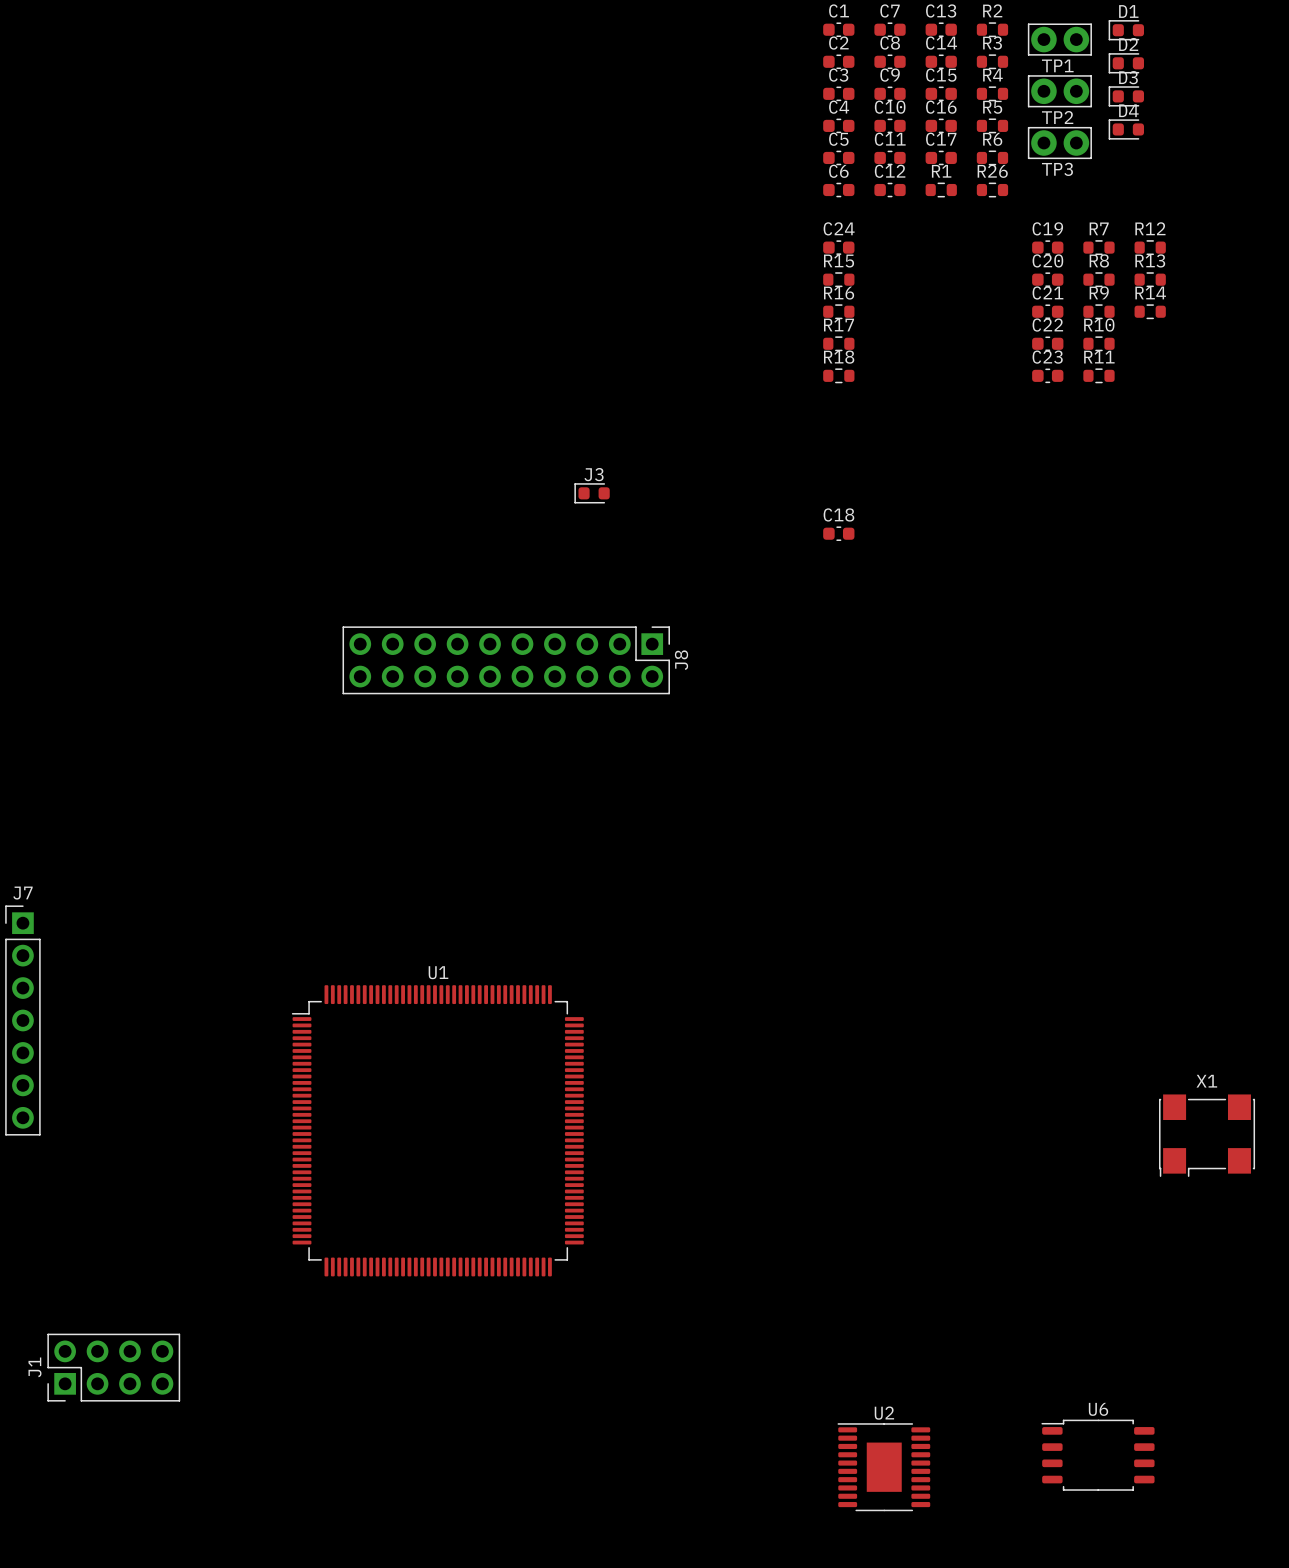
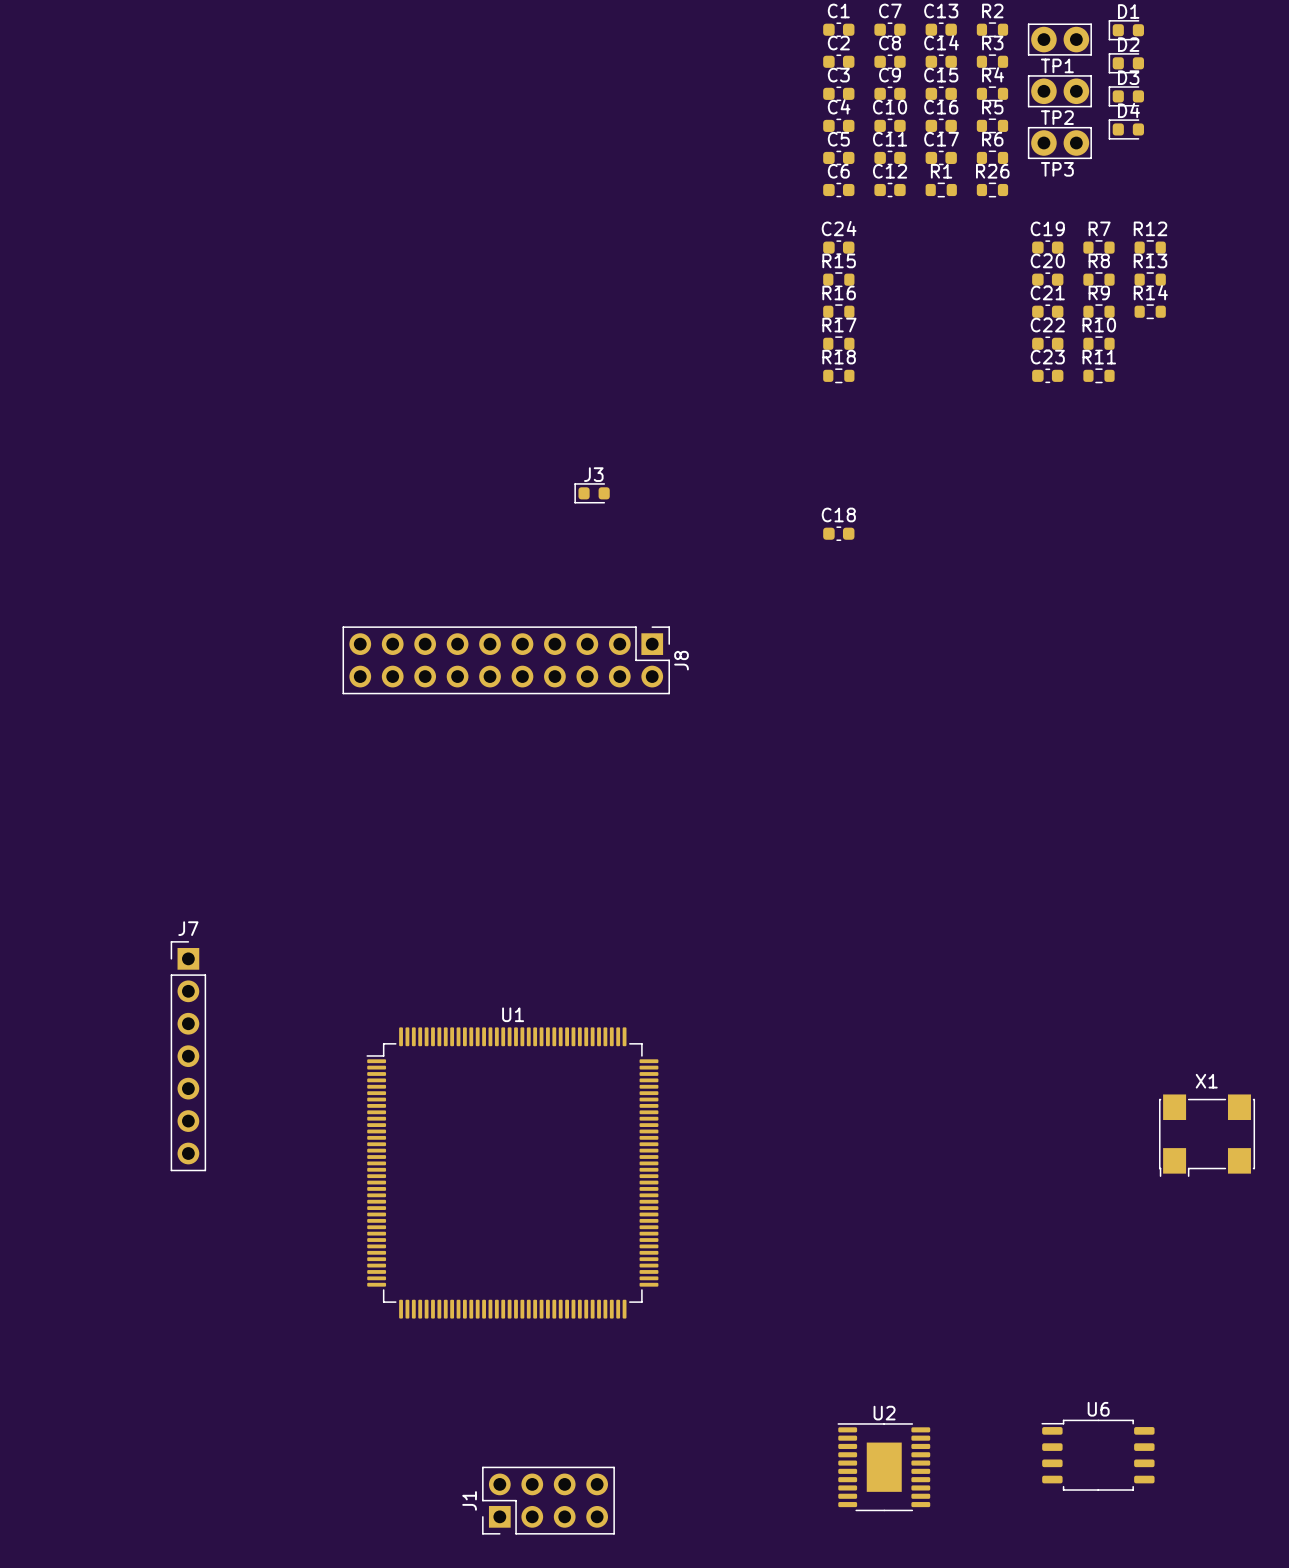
J7 position: (22, 1020) -> (188, 1056)
U1 position: (437, 1130) -> (512, 1172)
J1 position: (113, 1367) -> (548, 1500)

